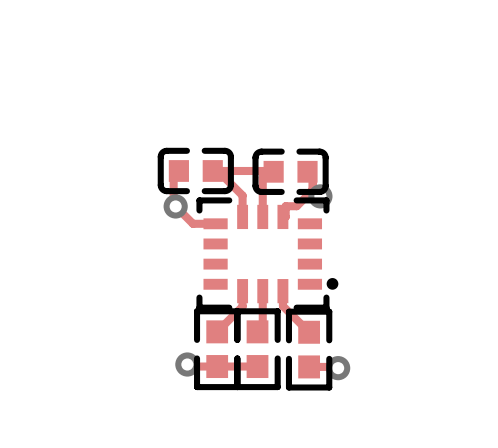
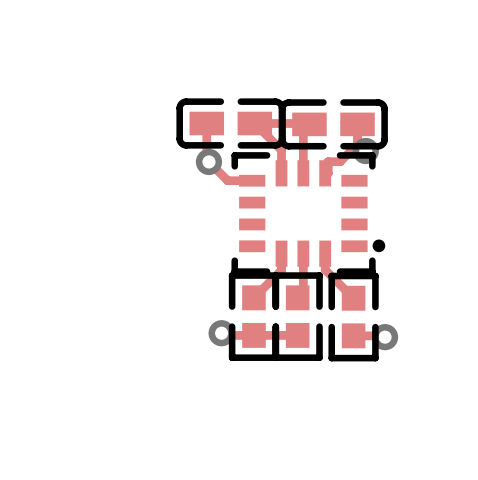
part footprint: [157, 147, 234, 195] -> [176, 98, 286, 149]
part footprint: [252, 148, 329, 195] -> [279, 99, 388, 150]

